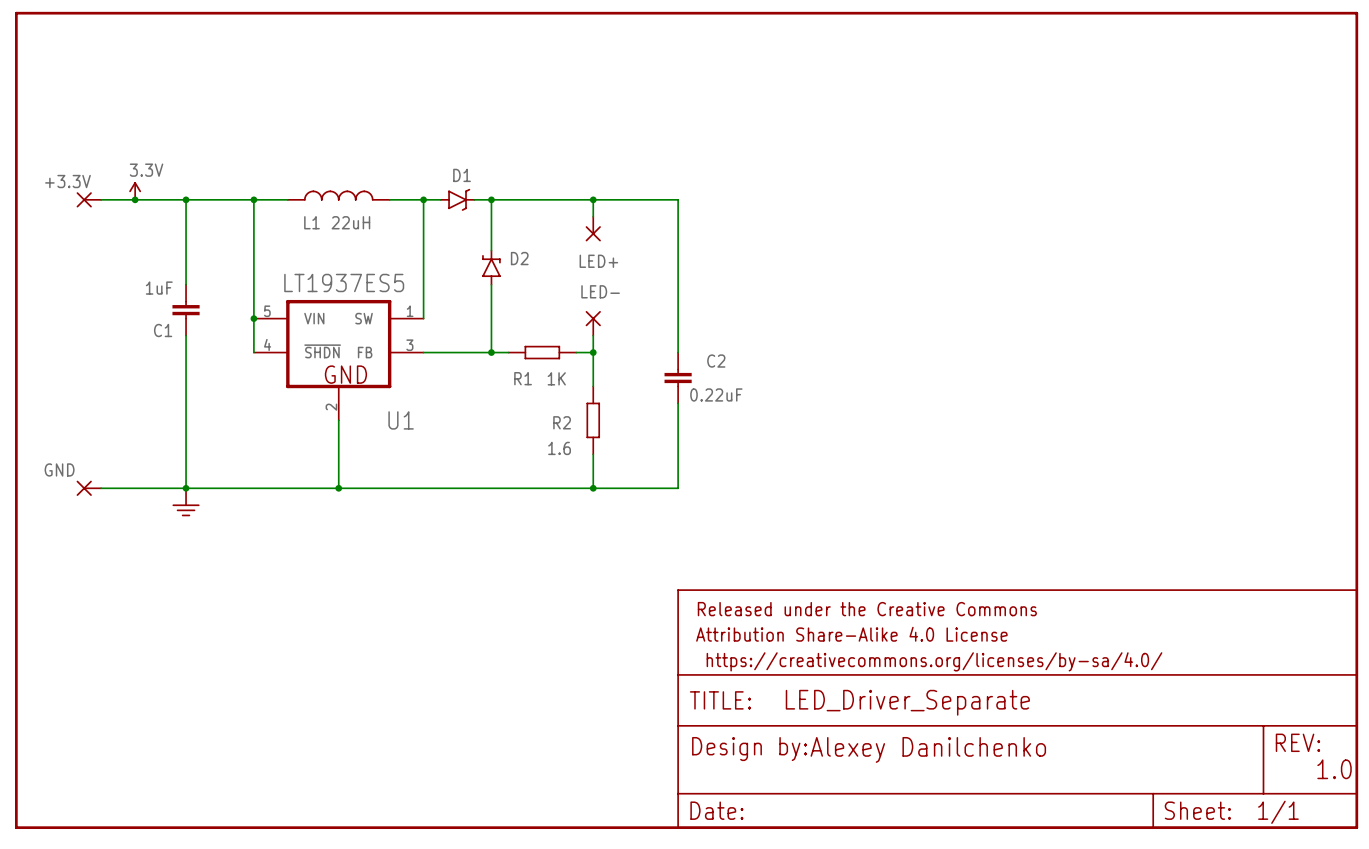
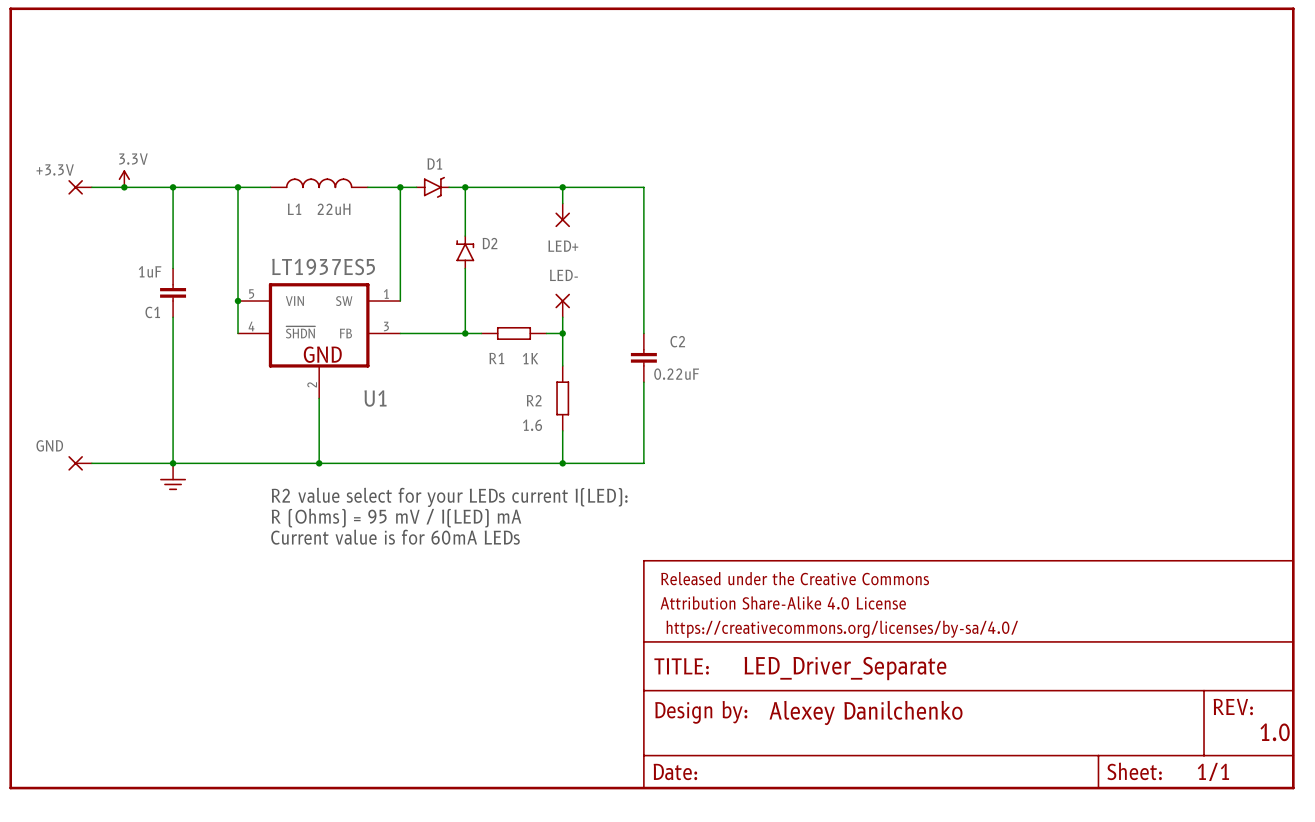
text: none -> R2 value select for your LEDs current I(LED): (449, 497)
text: none -> R (Ohms) = 95 mV / I(LED) mA (396, 518)
text: none -> Current value is for 60mA LEDs (395, 537)

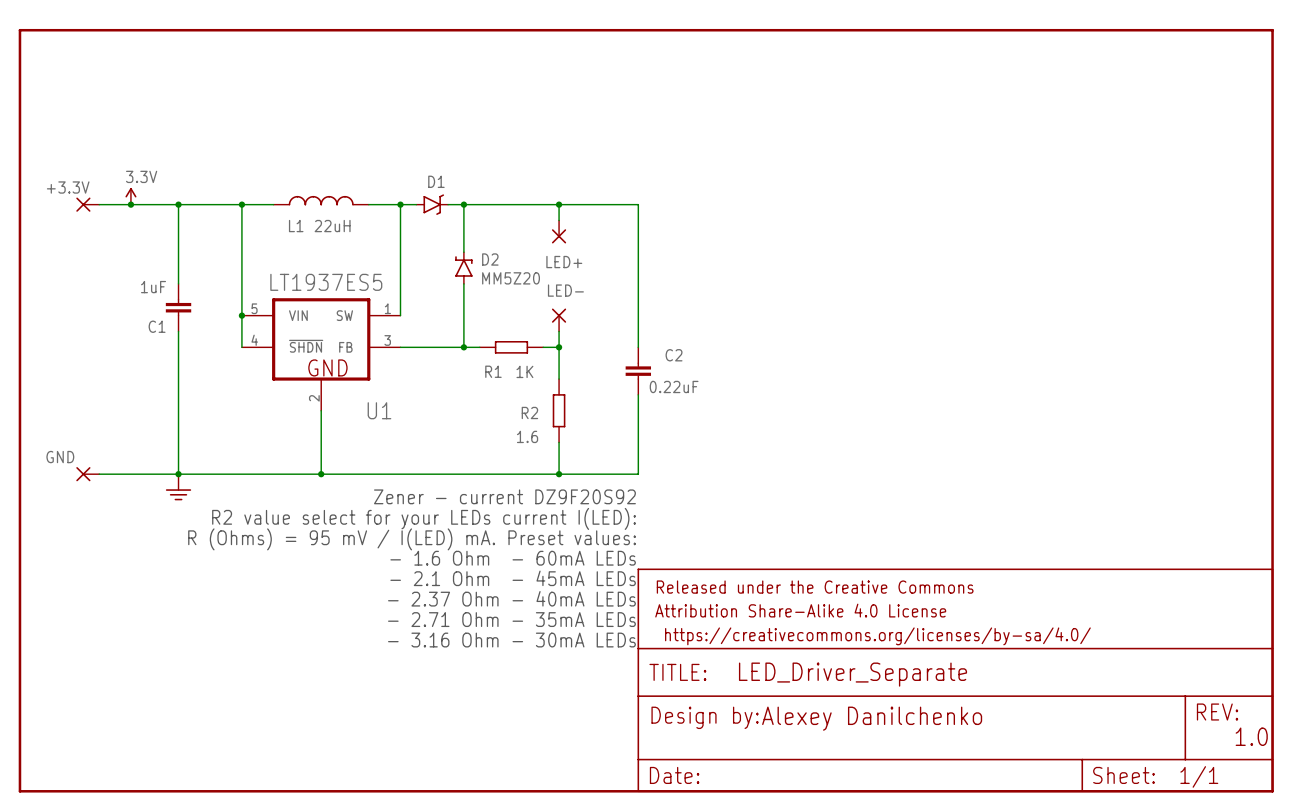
text: none -> MM5Z20 (511, 278)
text: none -> Zener - current DZ9F20S92 (504, 496)
text: R2 value select for your LEDs current I(LED): (449, 497) -> none
text: none -> R2 value select for your LEDs current I(LED): (424, 518)
text: R (Ohms) = 95 mV / I(LED) mA (396, 518) -> none
text: none -> R (Ohms) = 95 mV / I(LED) mA. Preset values: (412, 539)
text: Current value is for 60mA LEDs (395, 537) -> none
text: none -> - 1.6 Ohm - 60mA LEDs (513, 558)
text: none -> - 2.1 Ohm - 45mA LEDs (513, 578)
text: none -> - 2.37 Ohm - 40mA LEDs (511, 598)
text: none -> - 2.71 Ohm - 35mA LEDs (511, 619)
text: none -> - 3.16 Ohm - 30mA LEDs (511, 640)

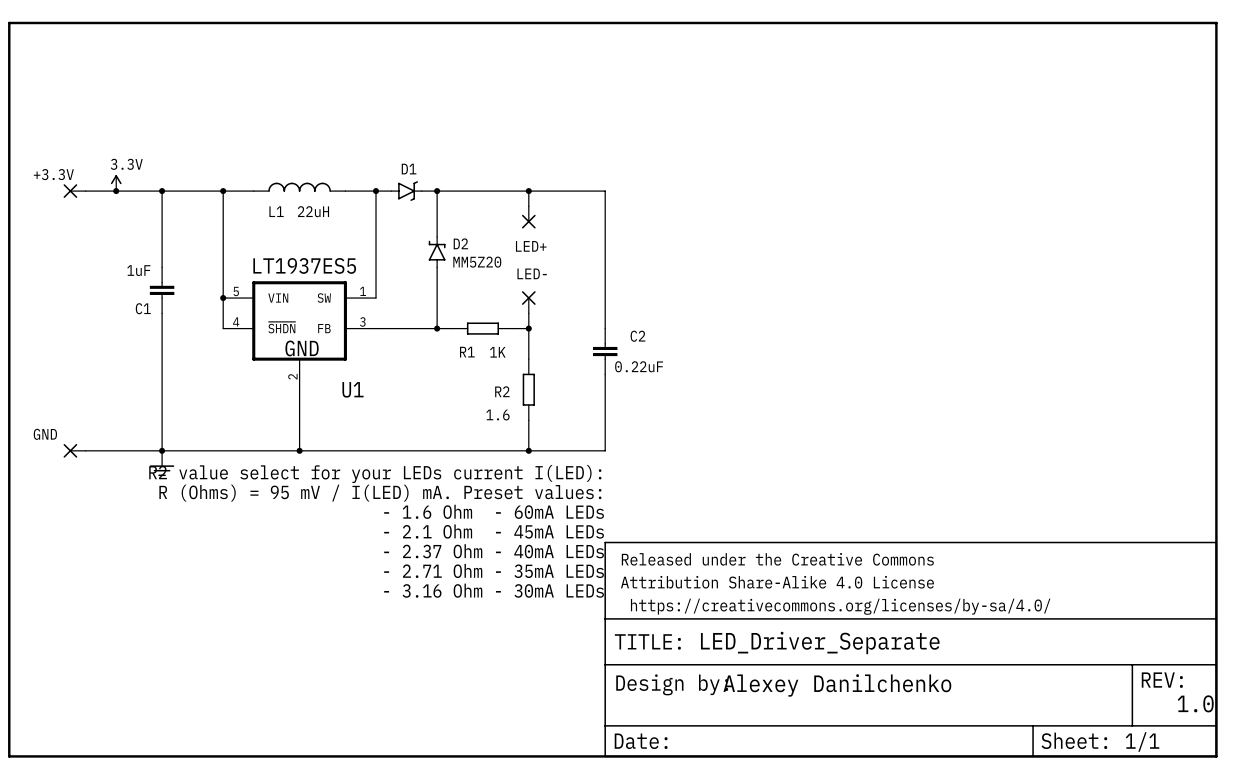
text: Zener - current DZ9F20S92 (504, 496) -> R2 value select for your LEDs current I(LED): (375, 473)
text: R2 value select for your LEDs current I(LED): (424, 518) -> R (Ohms) = 95 mV / I(LED) mA. Preset values: (380, 493)
text: R (Ohms) = 95 mV / I(LED) mA. Preset values: (412, 539) -> - 1.6 Ohm - 60mA LEDs (494, 511)
text: - 1.6 Ohm - 60mA LEDs (513, 558) -> - 2.1 Ohm - 45mA LEDs (494, 531)
text: - 2.1 Ohm - 45mA LEDs (513, 578) -> - 2.37 Ohm - 40mA LEDs (494, 551)
text: - 2.37 Ohm - 40mA LEDs (511, 598) -> - 2.71 Ohm - 35mA LEDs (494, 570)
text: - 2.71 Ohm - 35mA LEDs (511, 619) -> - 3.16 Ohm - 30mA LEDs (494, 590)
text: - 3.16 Ohm - 30mA LEDs (511, 640) -> none

